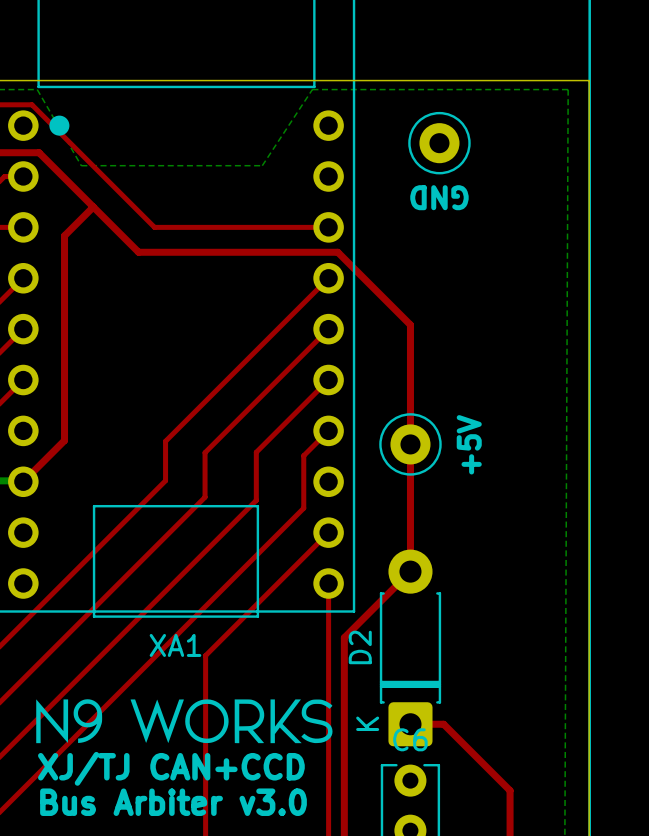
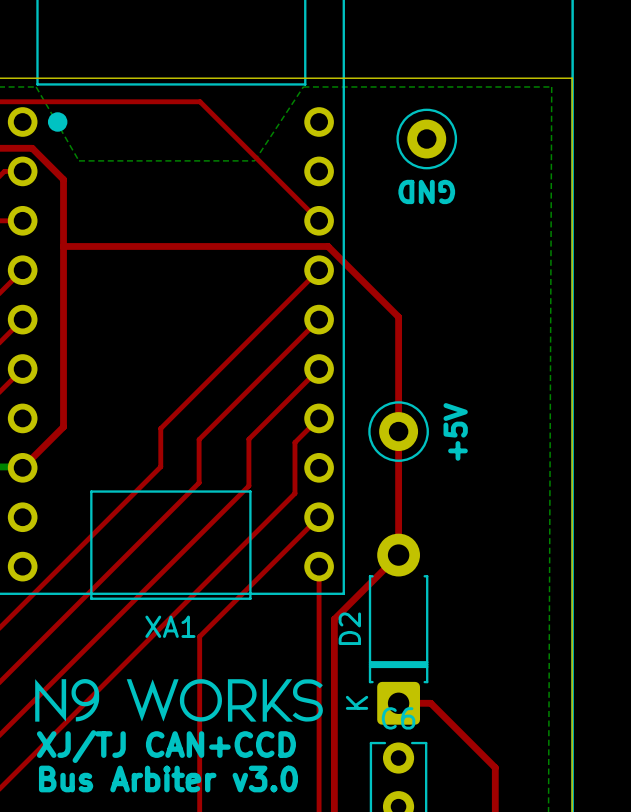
top track: (31, 104) (154, 227) (328, 227) -> (31, 101) (200, 101) (319, 220)
top track: (33, 152) (39, 152) (138, 252) (337, 252) (410, 326) -> (63, 246) (328, 246) (398, 317)
top track: (93, 206) (64, 235) (64, 440) -> (32, 148) (63, 179) (62, 427)

